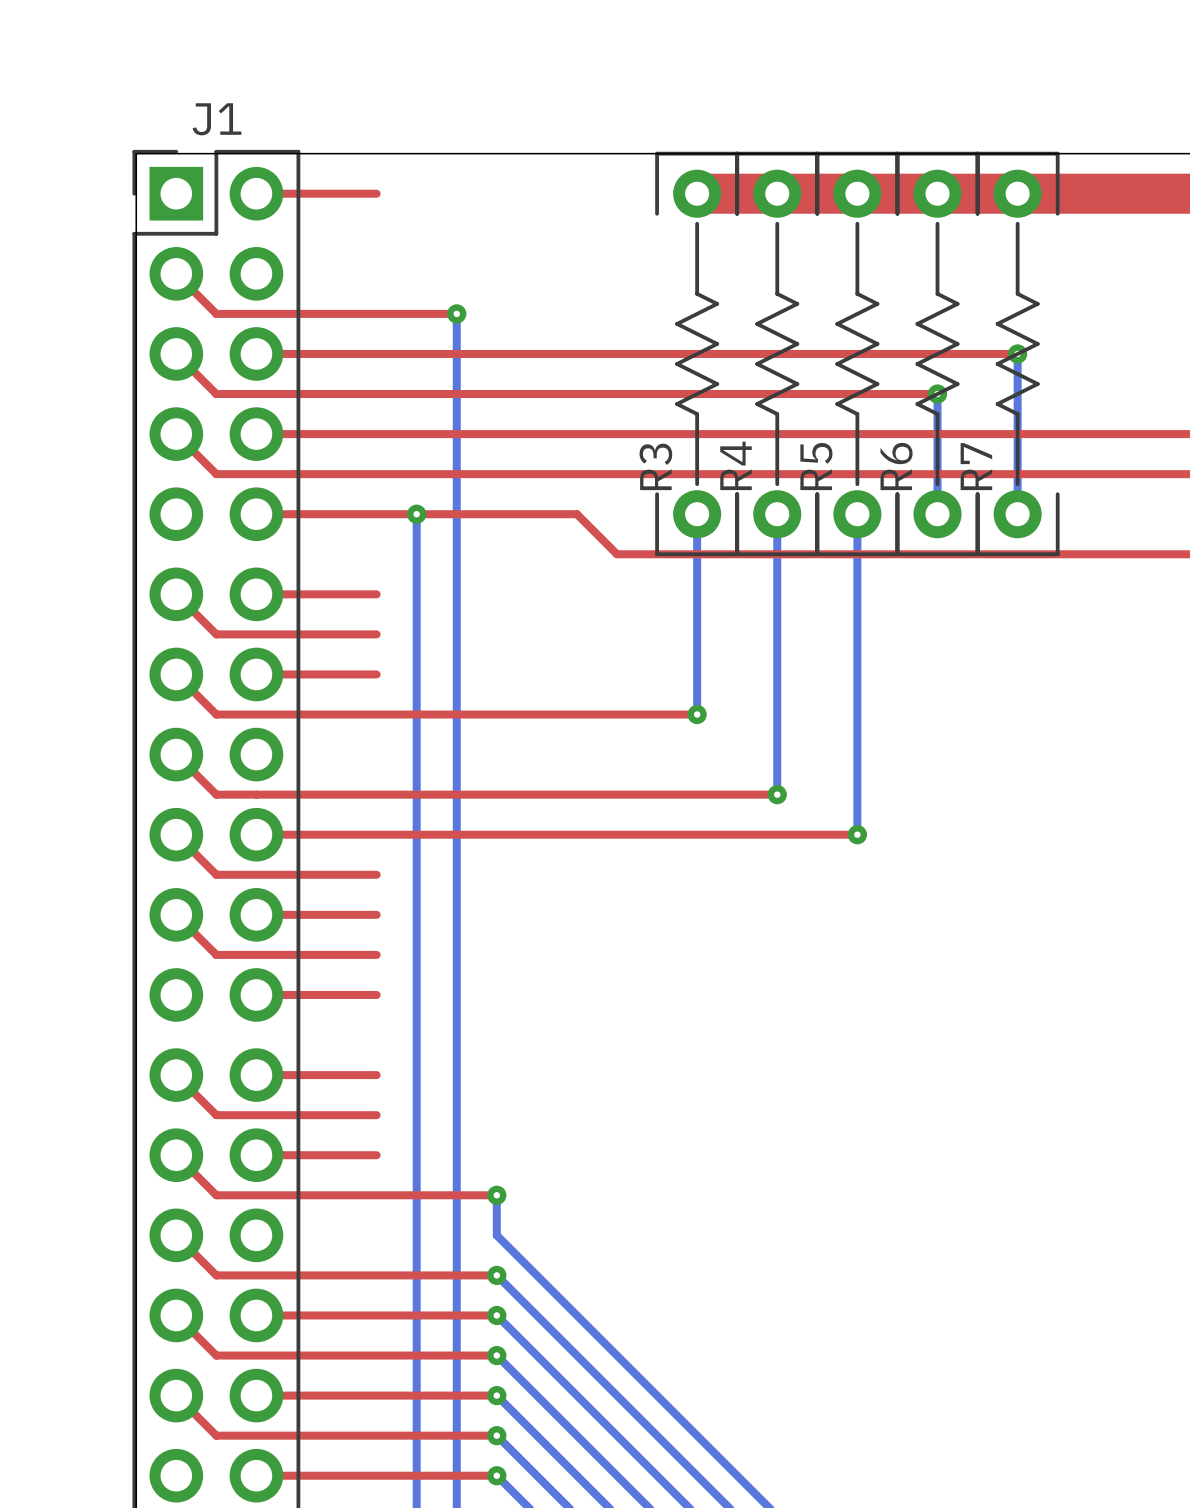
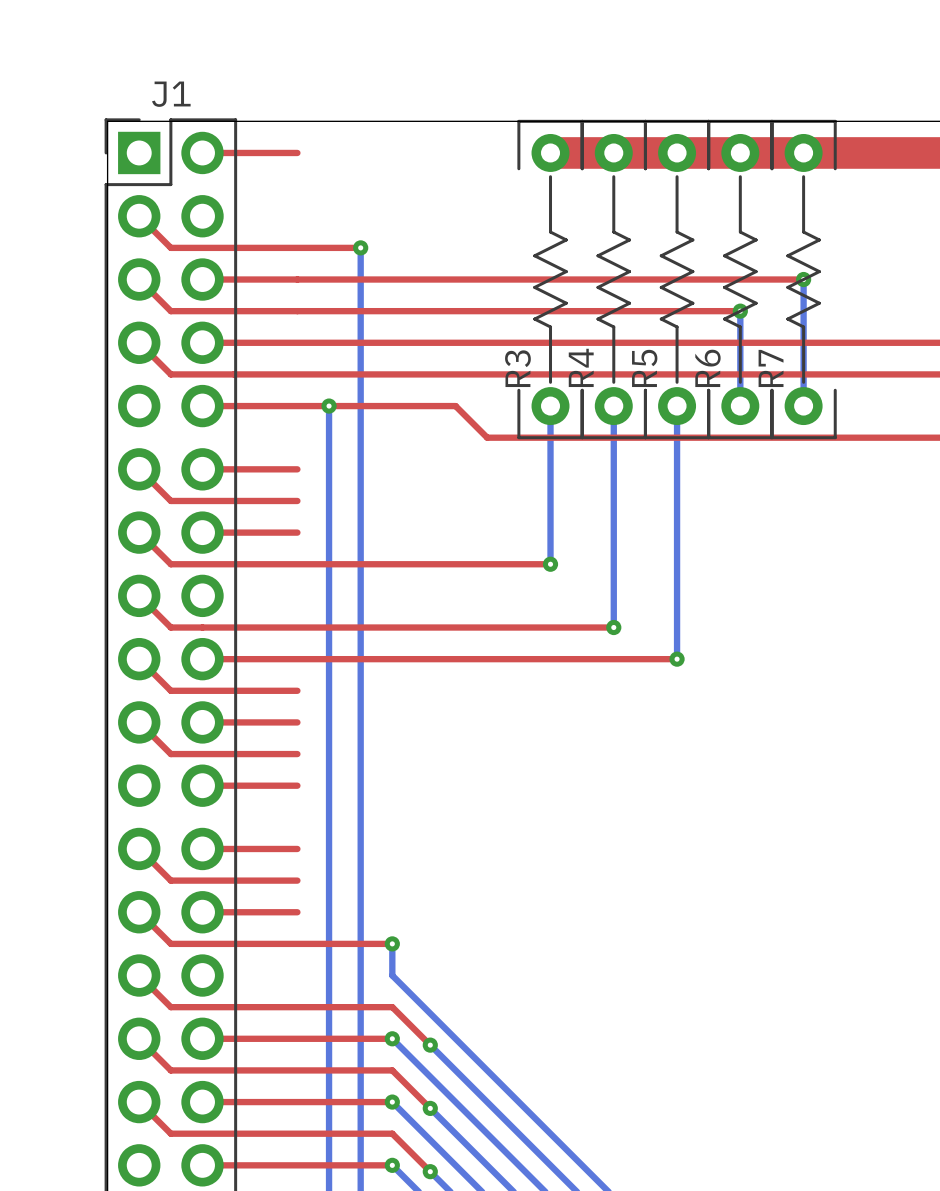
top track: none -> (392, 1007) (430, 1045)
bottom track: (496, 1275) (544, 1323) -> none
via: (496, 1275) -> none
via: none -> (430, 1045)
top track: none -> (392, 1070) (430, 1108)
bottom track: (496, 1355) (544, 1403) -> none
via: (496, 1355) -> none
via: none -> (430, 1108)
top track: none -> (392, 1133) (430, 1171)
bottom track: (496, 1435) (544, 1483) -> none
via: (496, 1435) -> none
via: none -> (430, 1171)

